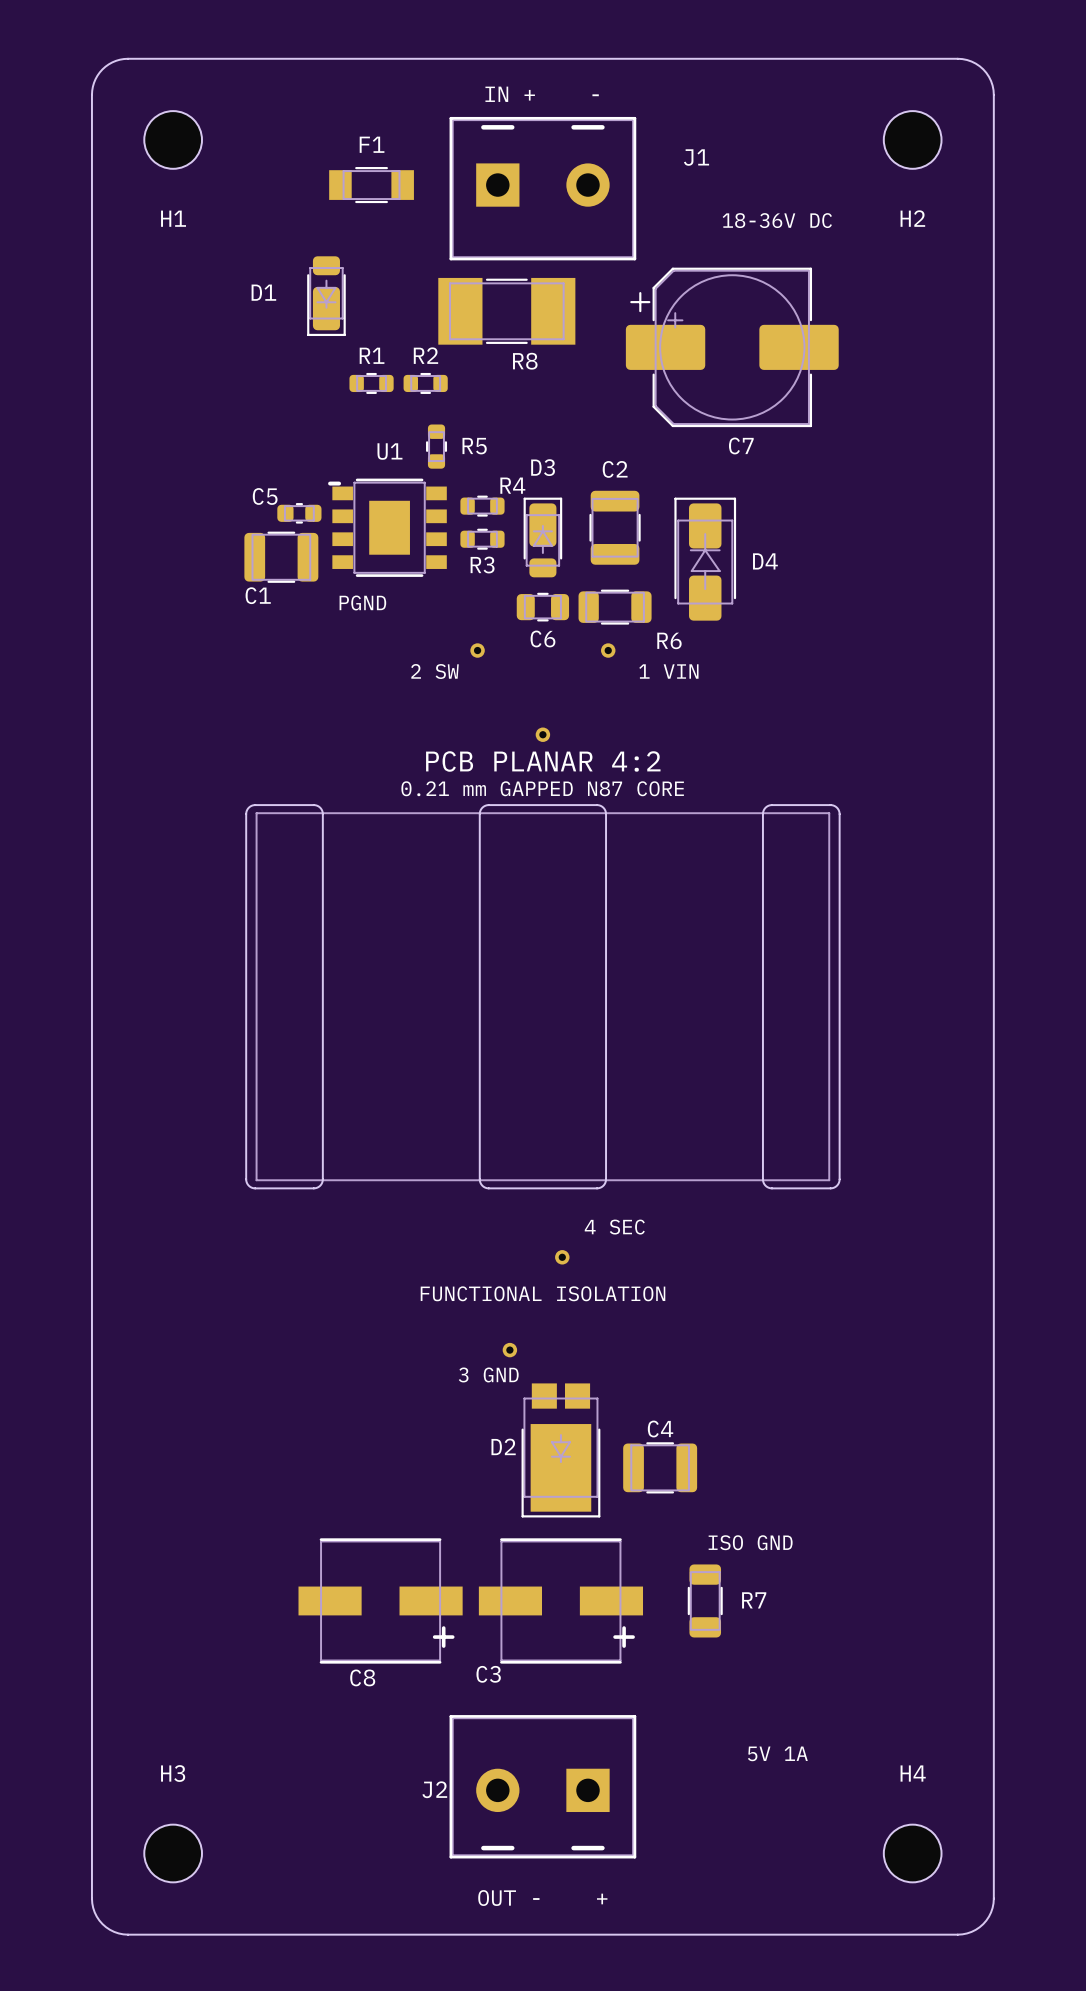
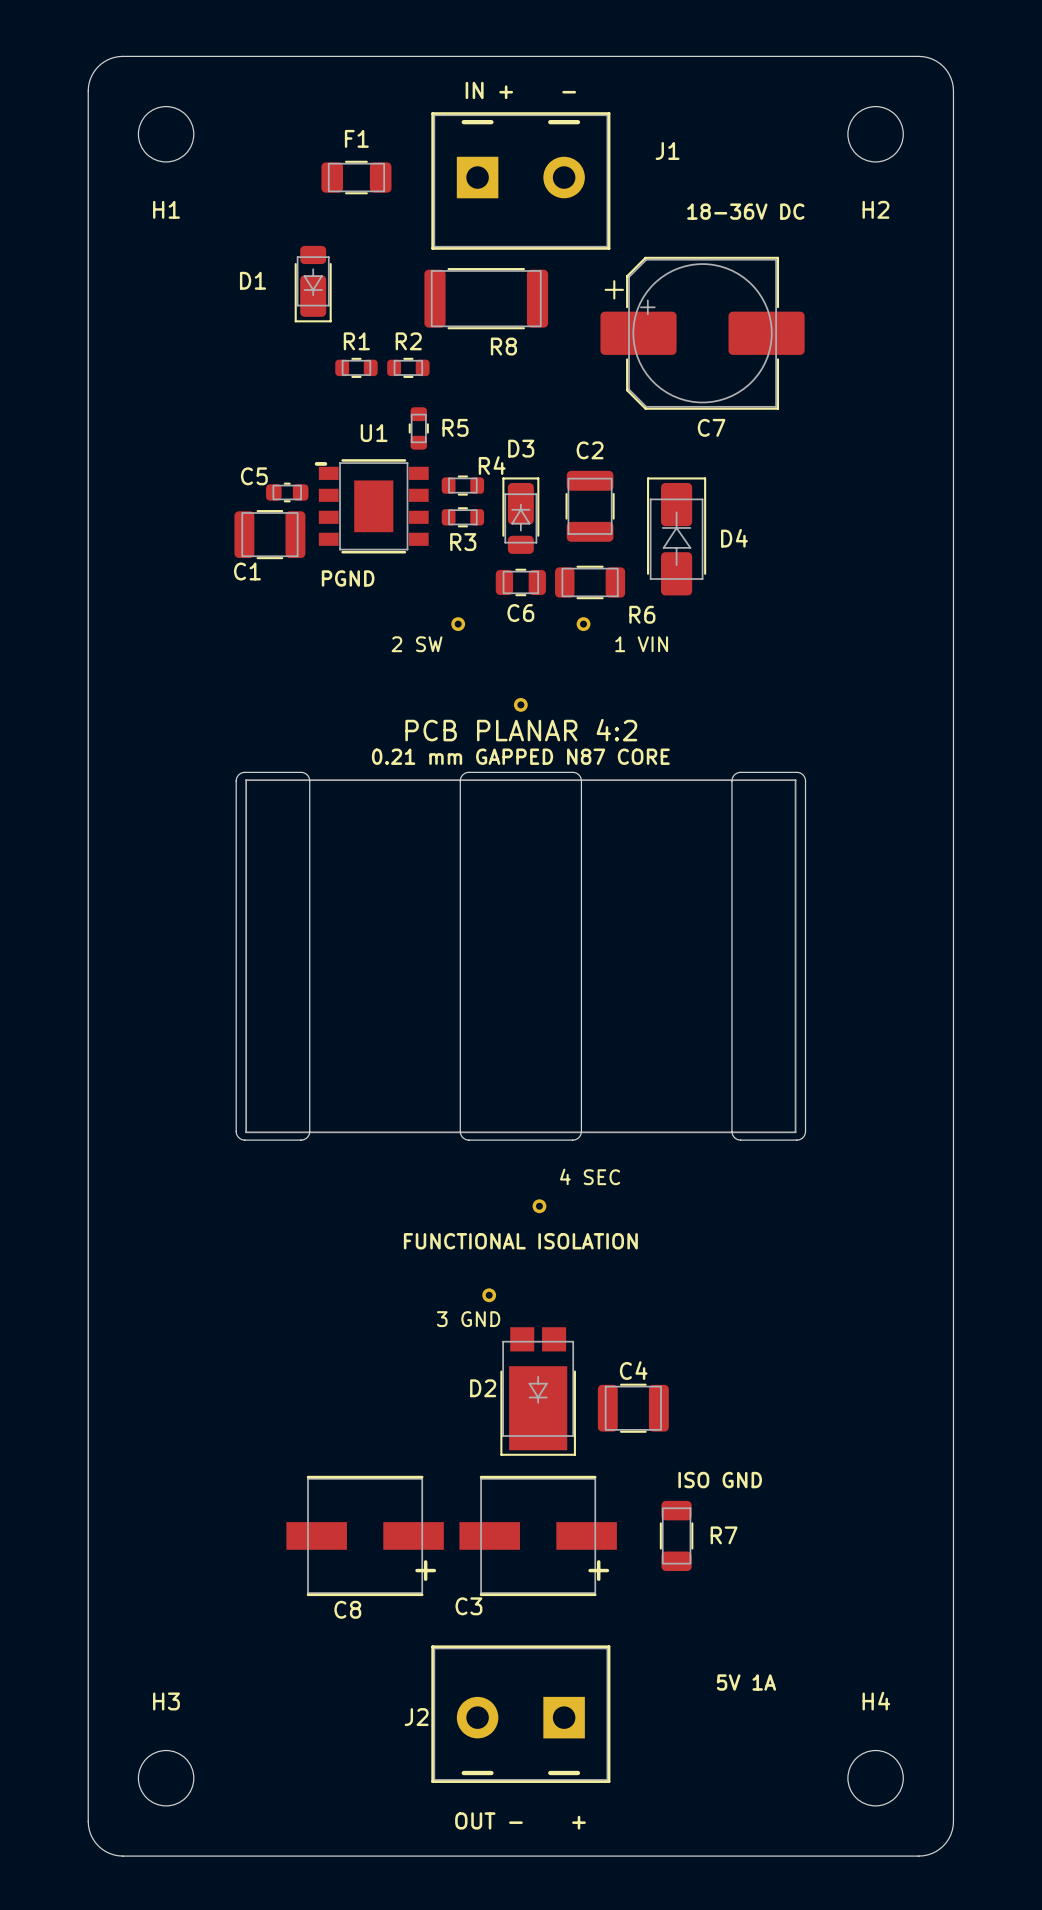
F1 footprint: [329, 167, 414, 204] -> [321, 160, 392, 195]
R8 footprint: [438, 277, 576, 345] -> [424, 268, 549, 330]

